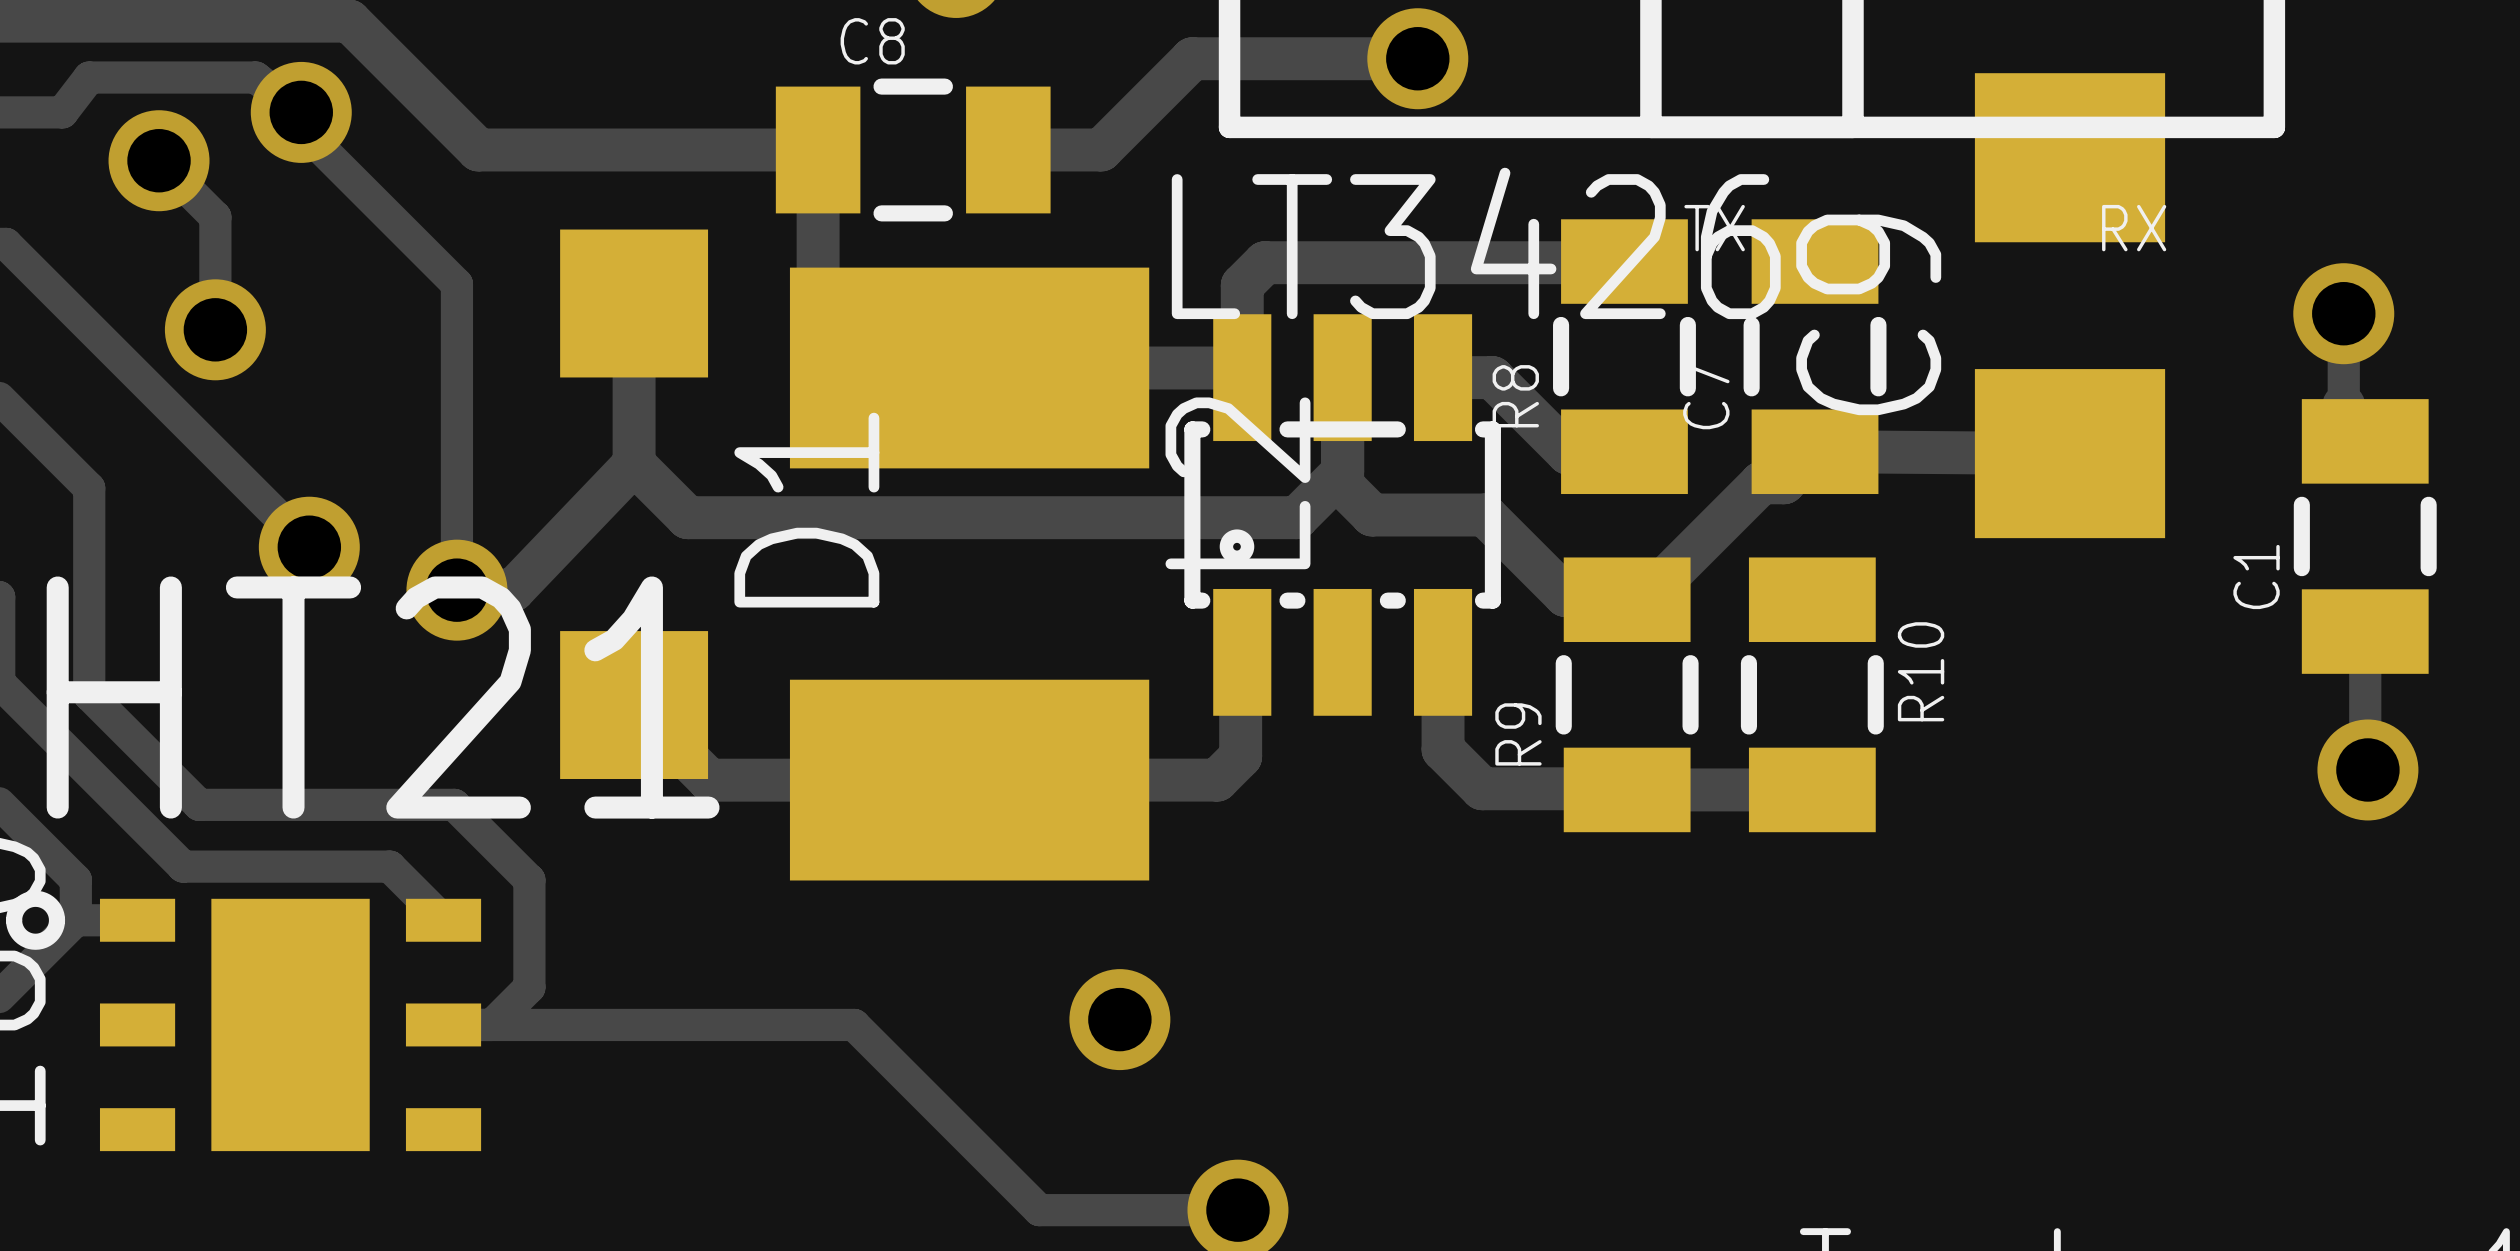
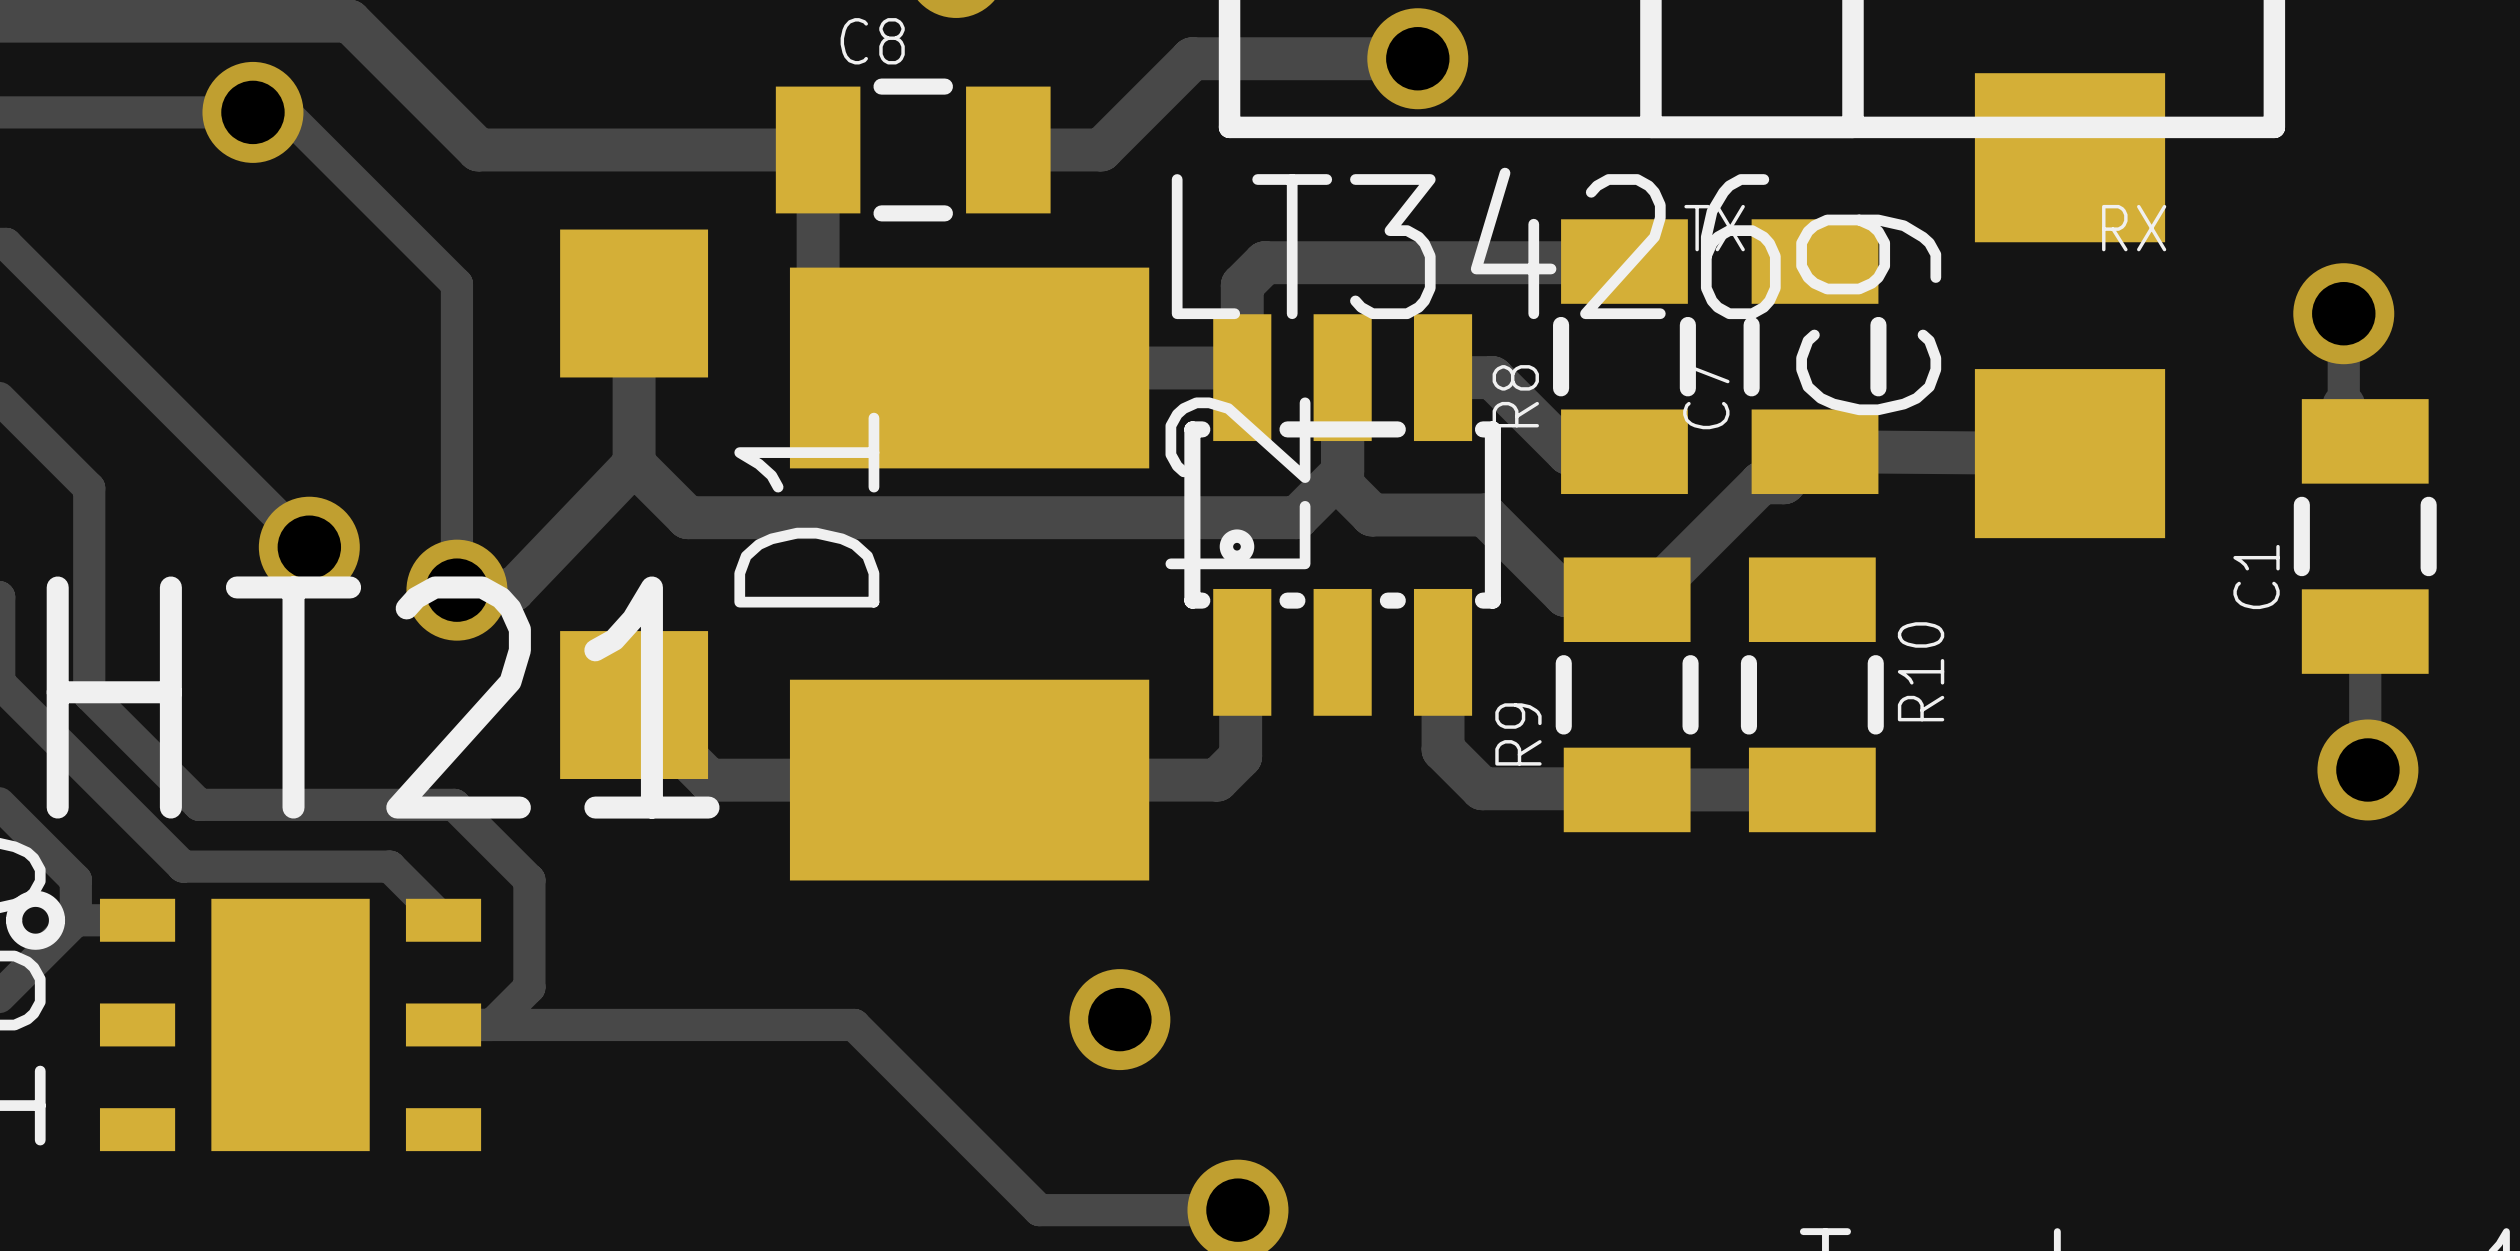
track: (62, 112) (89, 77) (255, 77) (301, 112) (285, 112) -> (62, 112) (285, 112)
via position: (301, 112) -> (252, 112)
track: (159, 160) (215, 217) (215, 329) -> none
via: (159, 160) -> none
via: (215, 329) -> none

